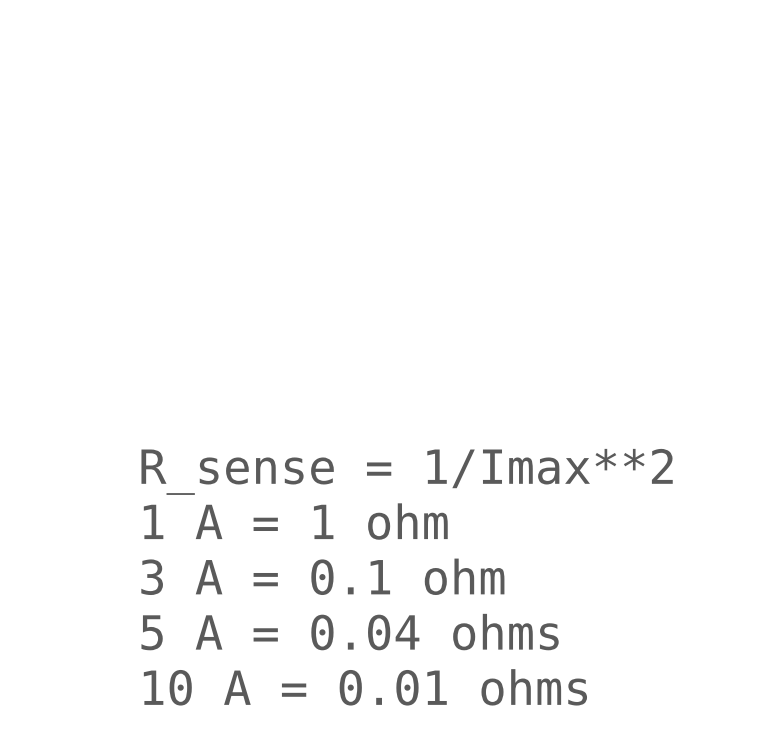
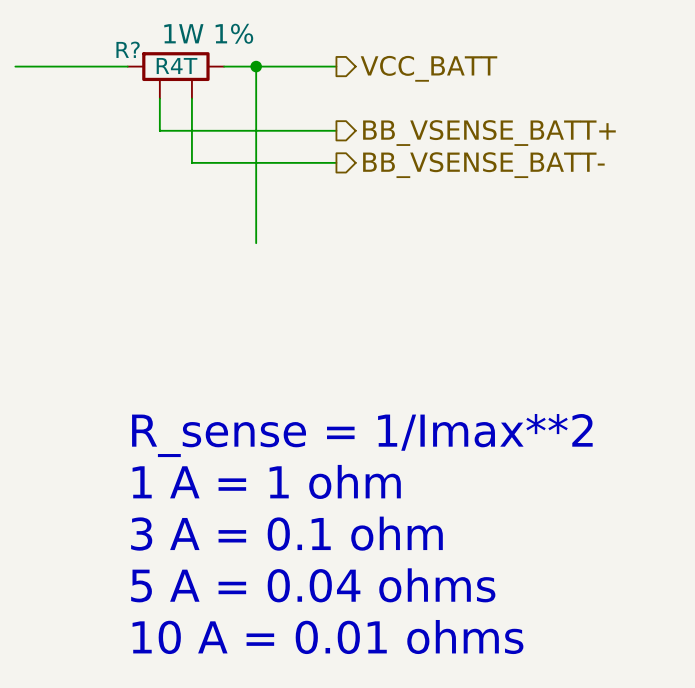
wire: none -> (15, 66) (127, 66)
wire: none -> (224, 66) (336, 66)
wire: none -> (256, 66) (256, 243)
junction: none -> (256, 66)
hierarchical label: none -> VCC_BATT (428, 68)
R?: none -> R4T (175, 75)
wire: none -> (159, 98) (159, 130) (336, 130)
wire: none -> (191, 98) (191, 162) (336, 162)
hierarchical label: none -> BB_VSENSE_BATT+ (489, 133)
hierarchical label: none -> BB_VSENSE_BATT- (483, 165)

